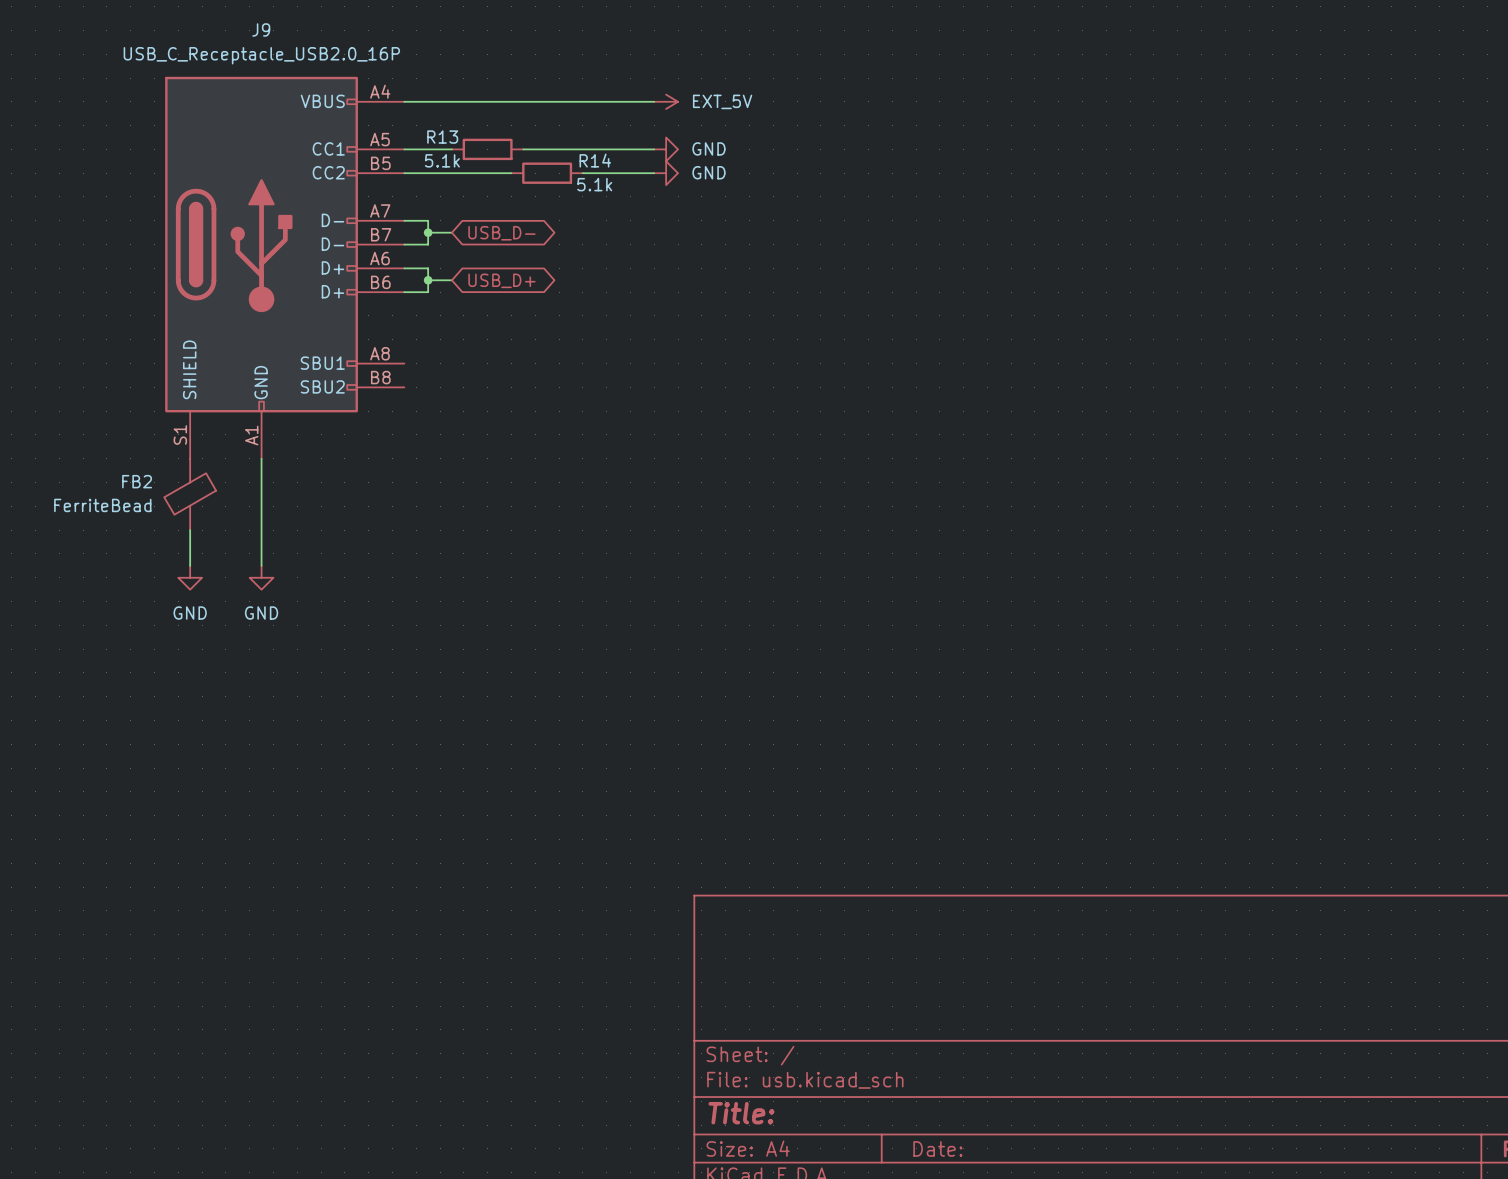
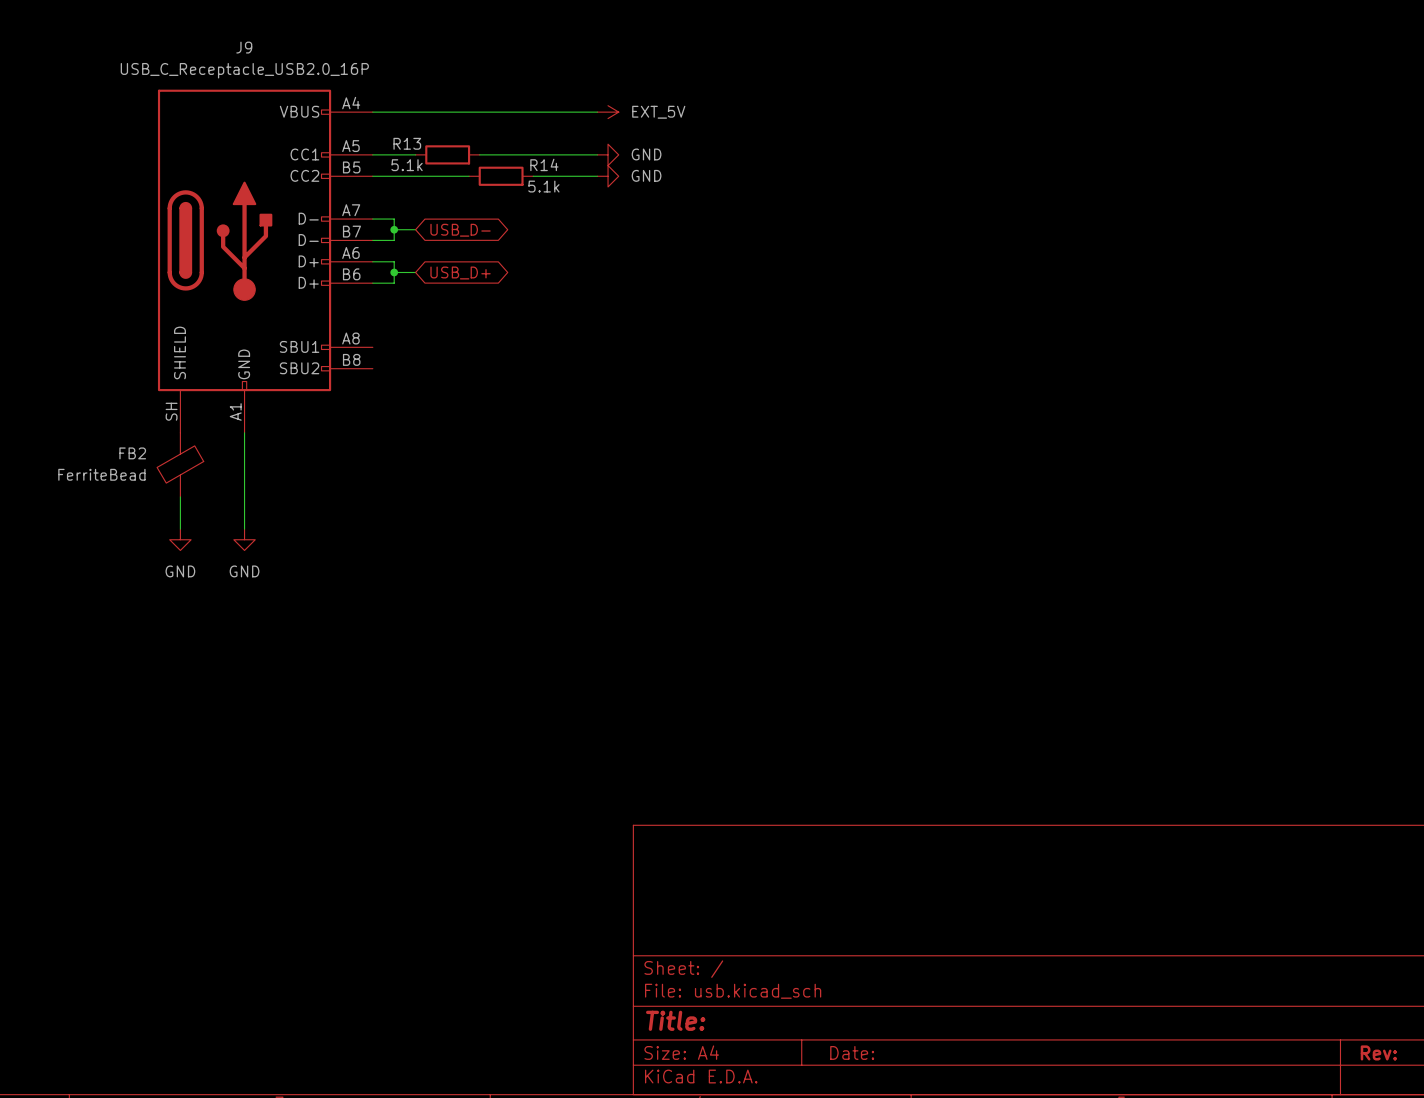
J9 pin number: S1 (180, 434) -> SH (171, 411)

